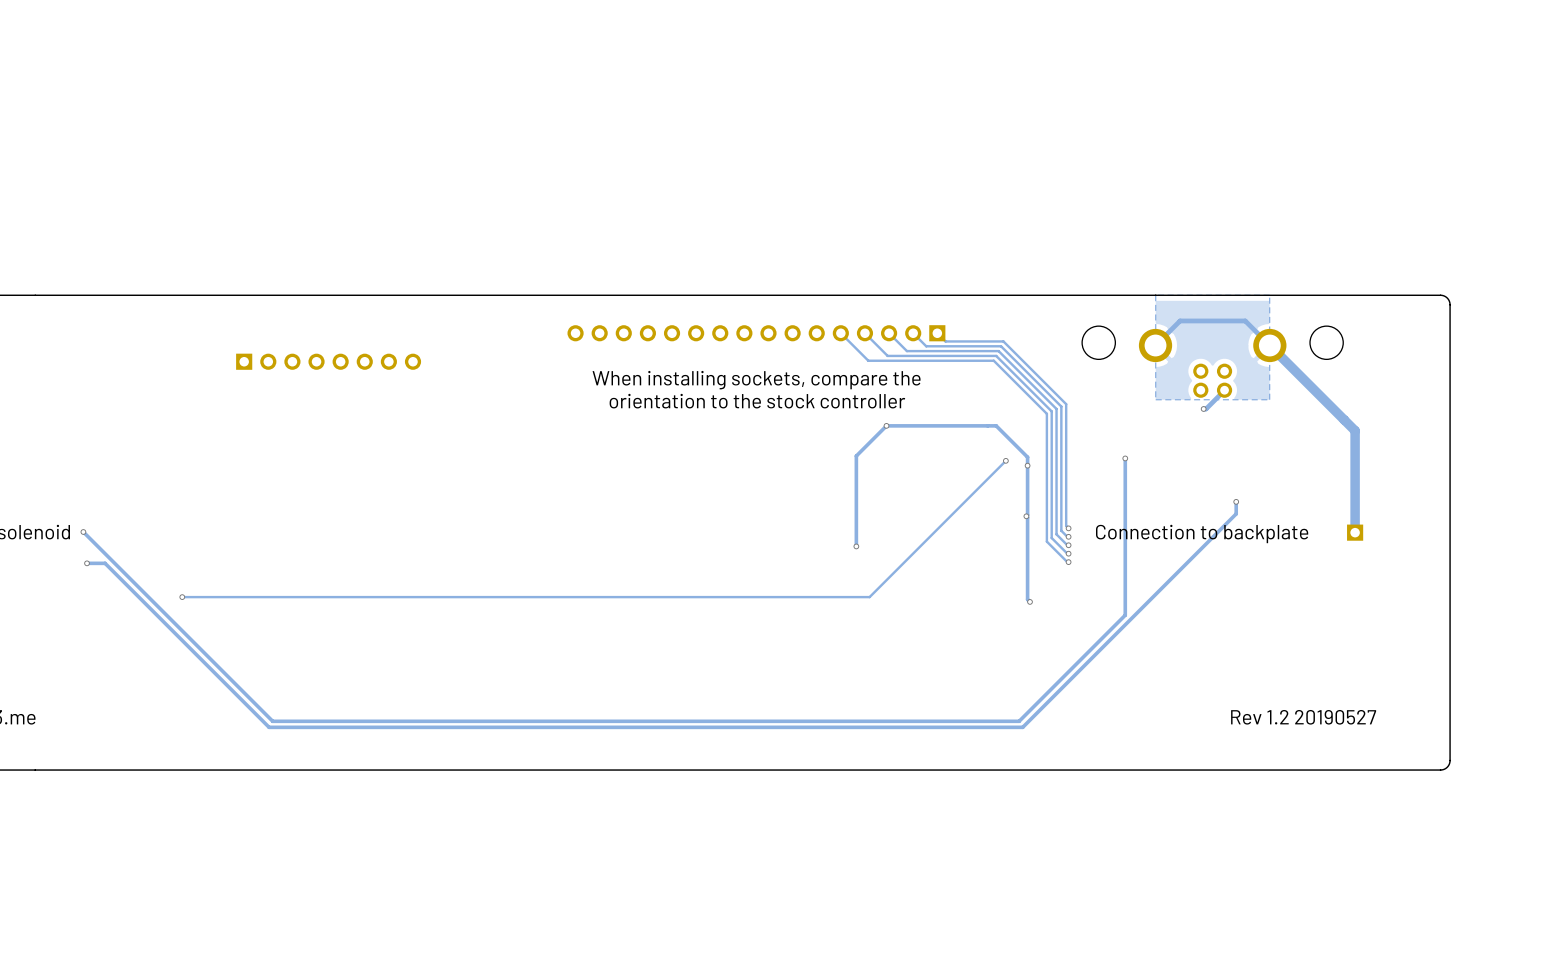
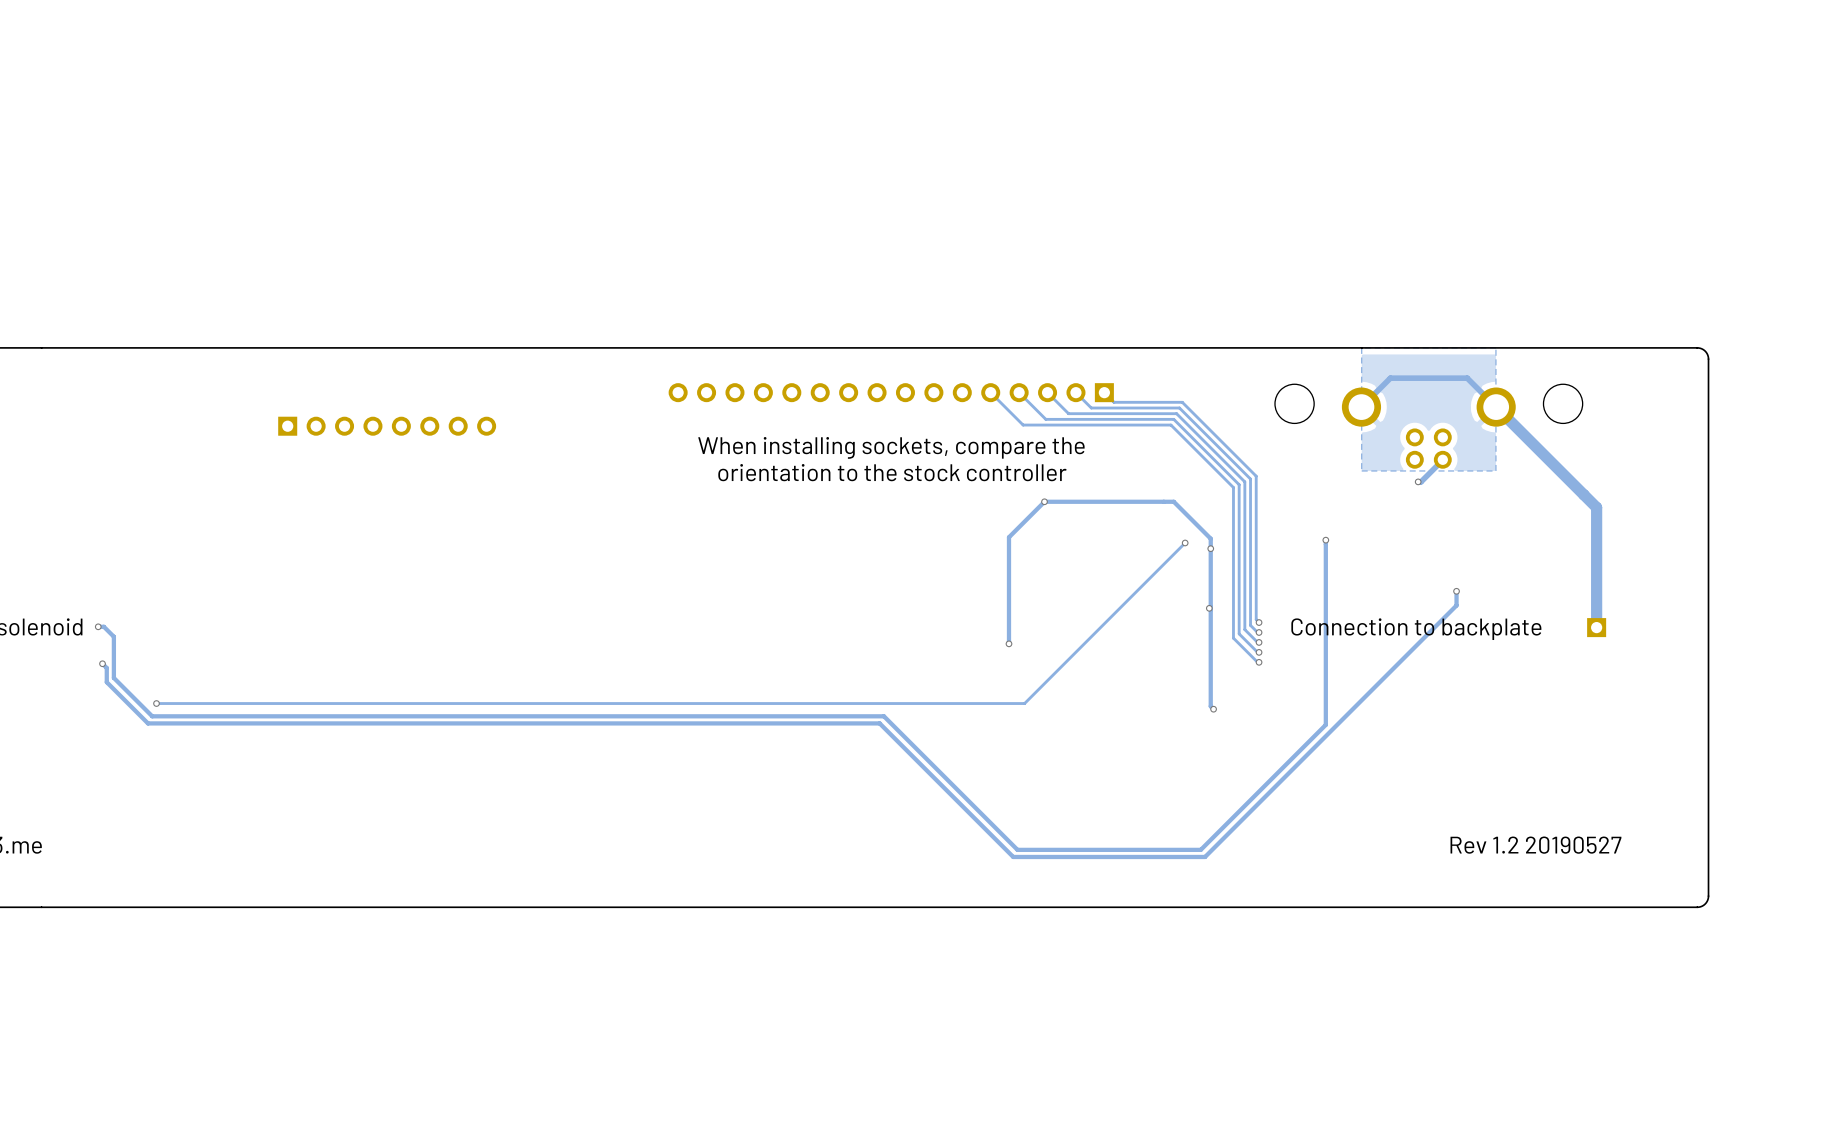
track: (83, 531) (272, 721) (863, 721) -> (98, 626) (103, 626) (113, 636) (113, 677) (152, 716) (883, 716) (1017, 849)
track: (87, 563) (105, 563) (269, 727) (859, 727) -> (102, 663) (106, 668) (106, 682) (147, 723) (879, 723) (1013, 856)
track: none -> (214, 703) (156, 703)
via position: (182, 597) -> (156, 703)

